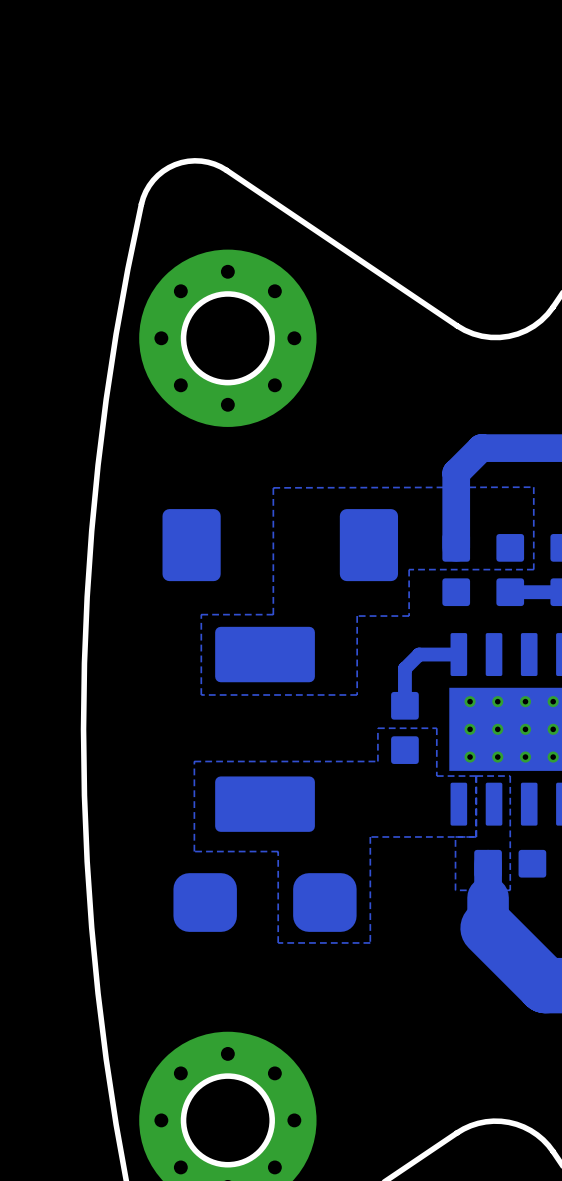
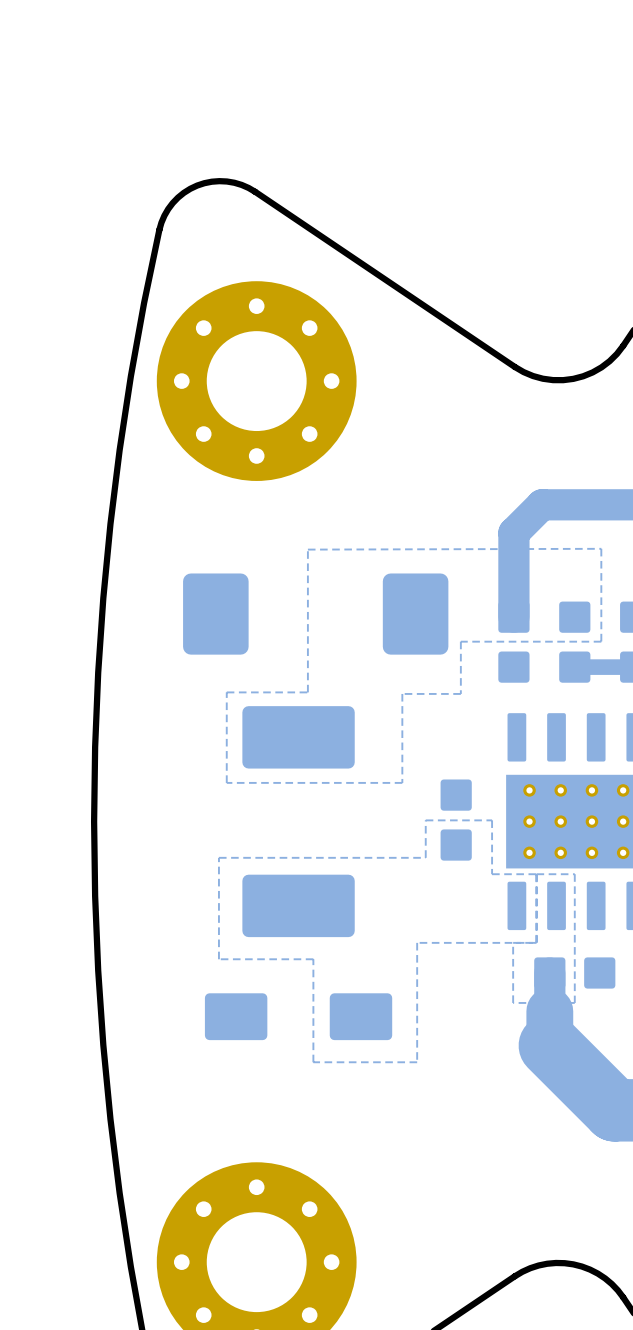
round board edge: [180, 291, 275, 386] -> none
bottom track: (458, 654) (419, 654) (404, 668) (404, 705) -> none
part footprint: [173, 873, 357, 932] -> [204, 993, 393, 1041]
round board edge: [180, 1073, 275, 1168] -> none

